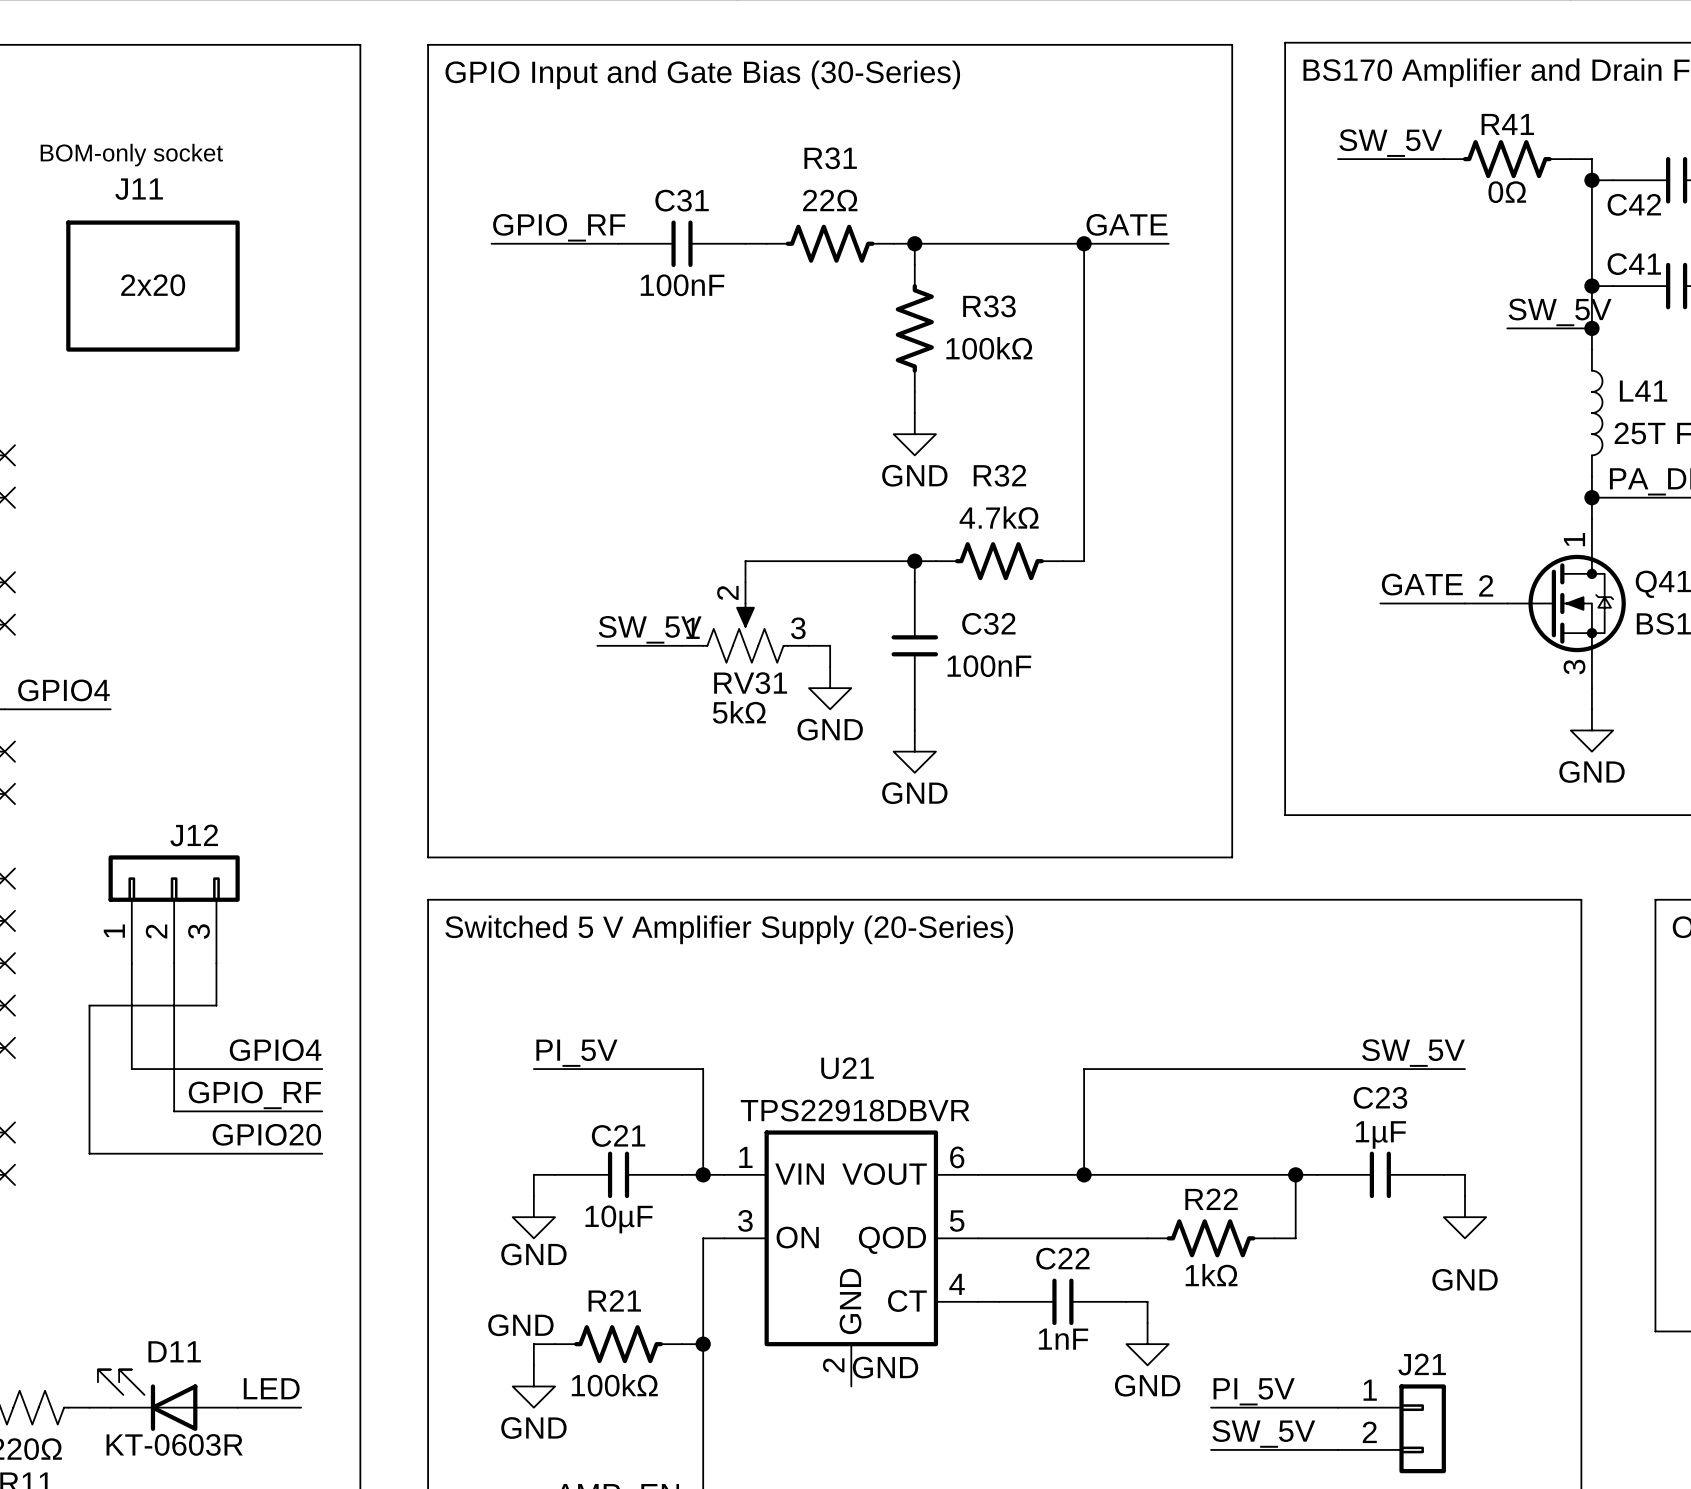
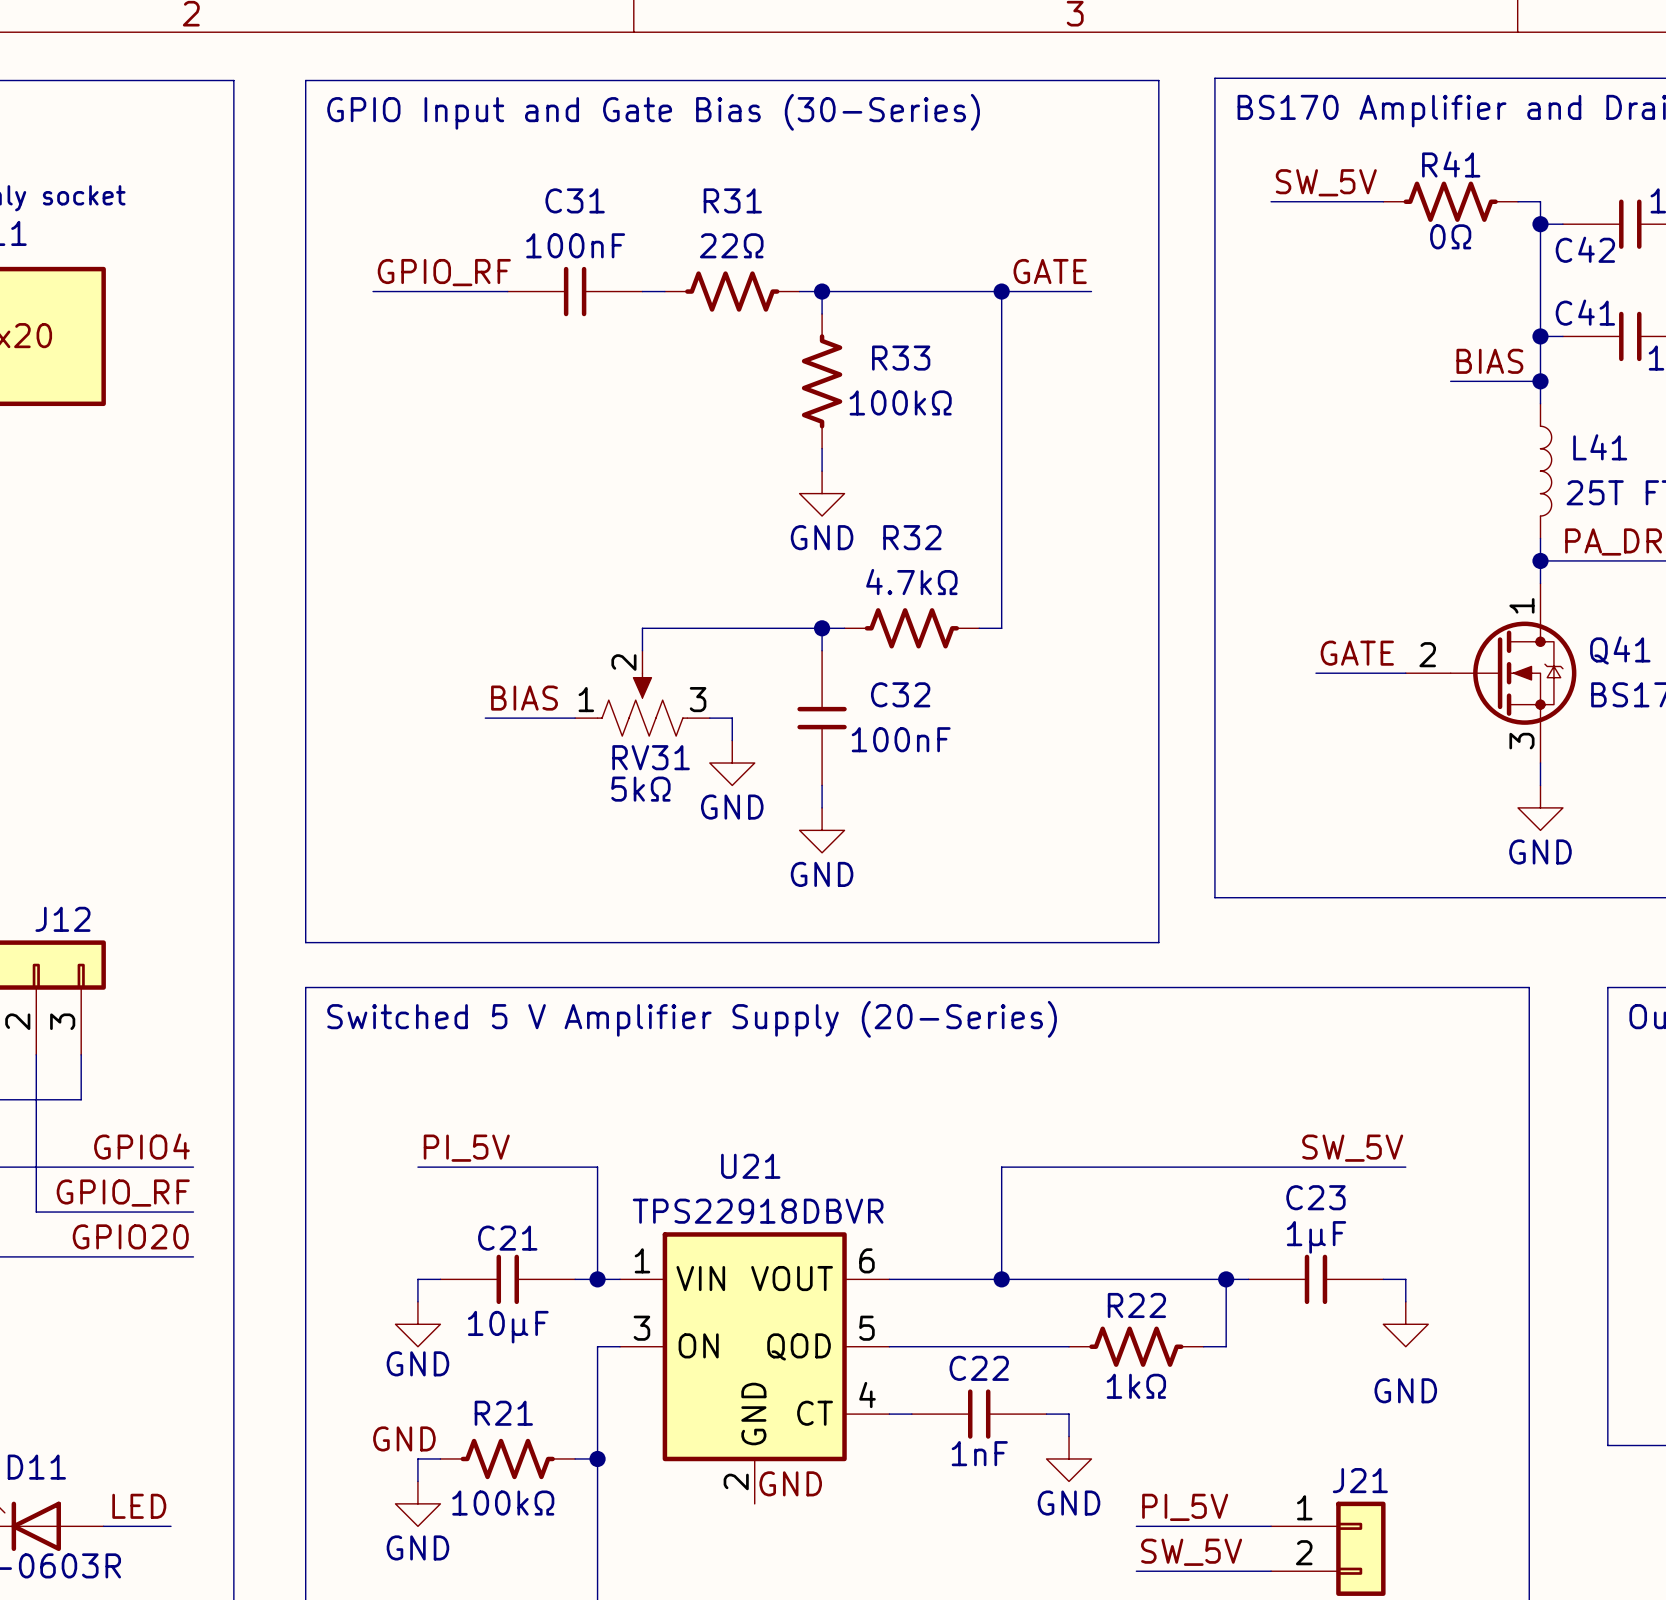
C31 name position: C31 (682, 200) -> C31 (575, 200)
C31 value position: 100nF (682, 285) -> 100nF (575, 245)
label: SW_5V (1560, 312) -> BIAS (1489, 361)
label: SW_5V (650, 629) -> BIAS (524, 698)

